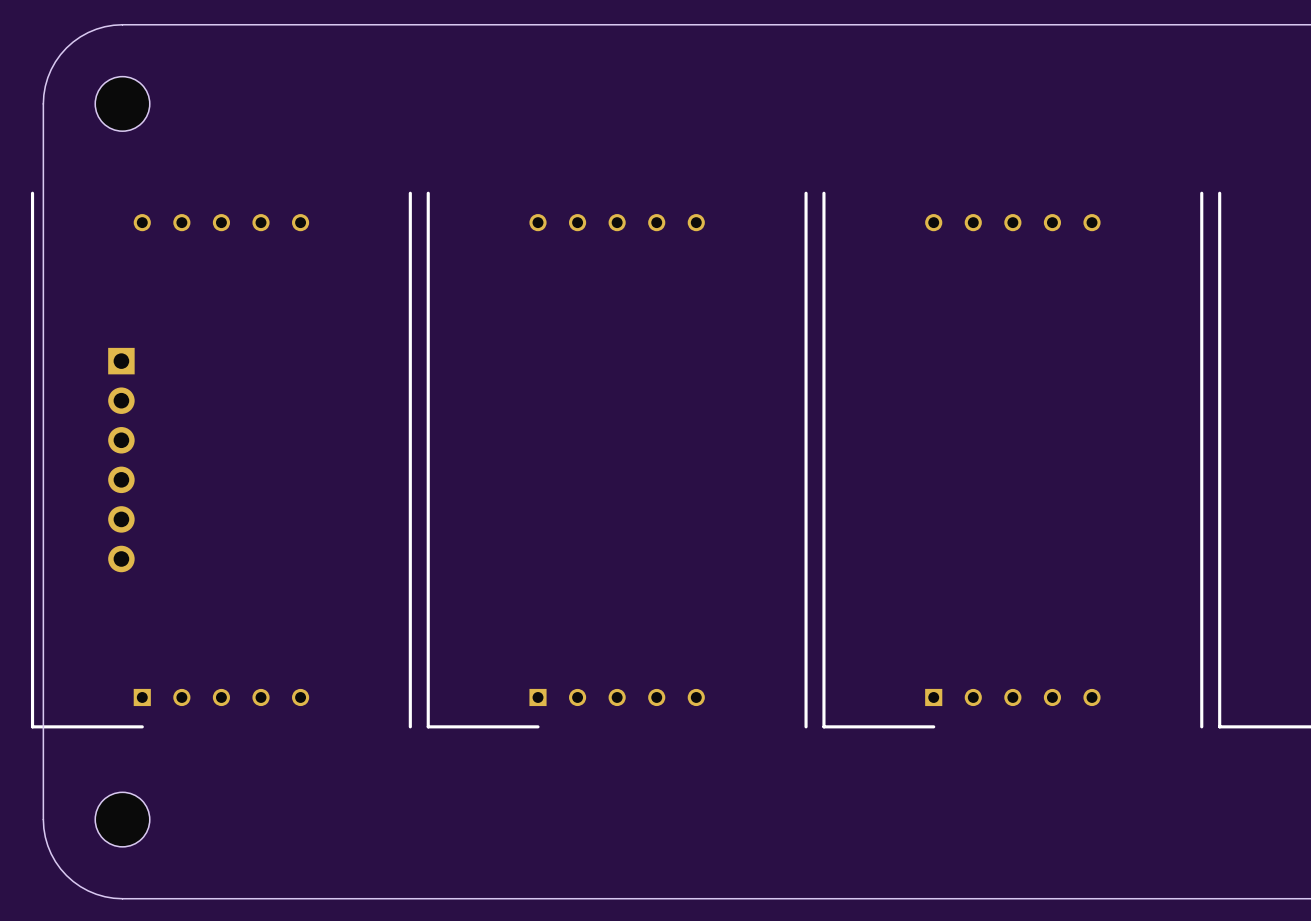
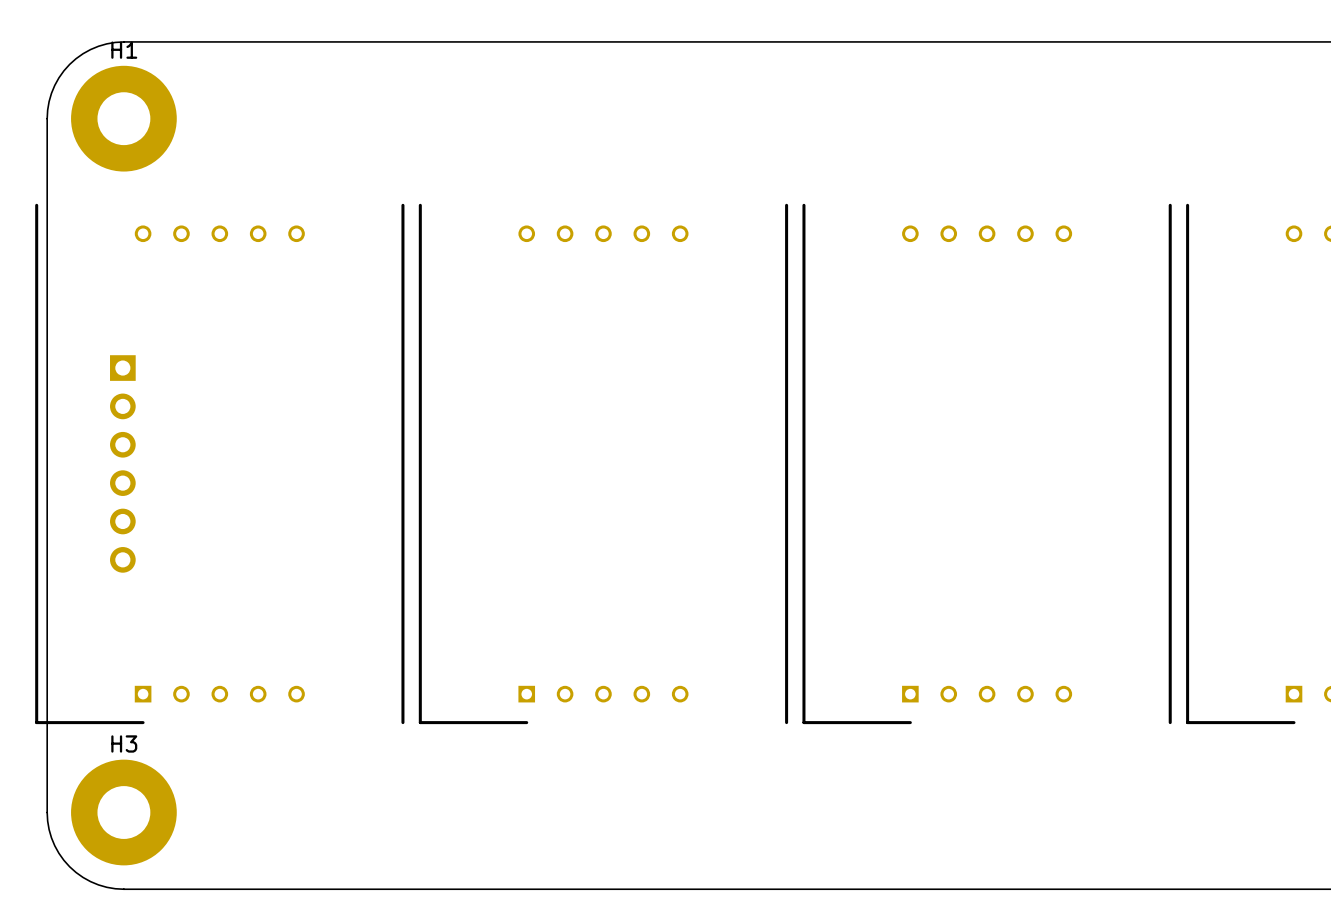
part: (122, 103) -> none
H1: none -> (123, 118)
part: (122, 819) -> none
H3: none -> (123, 812)

